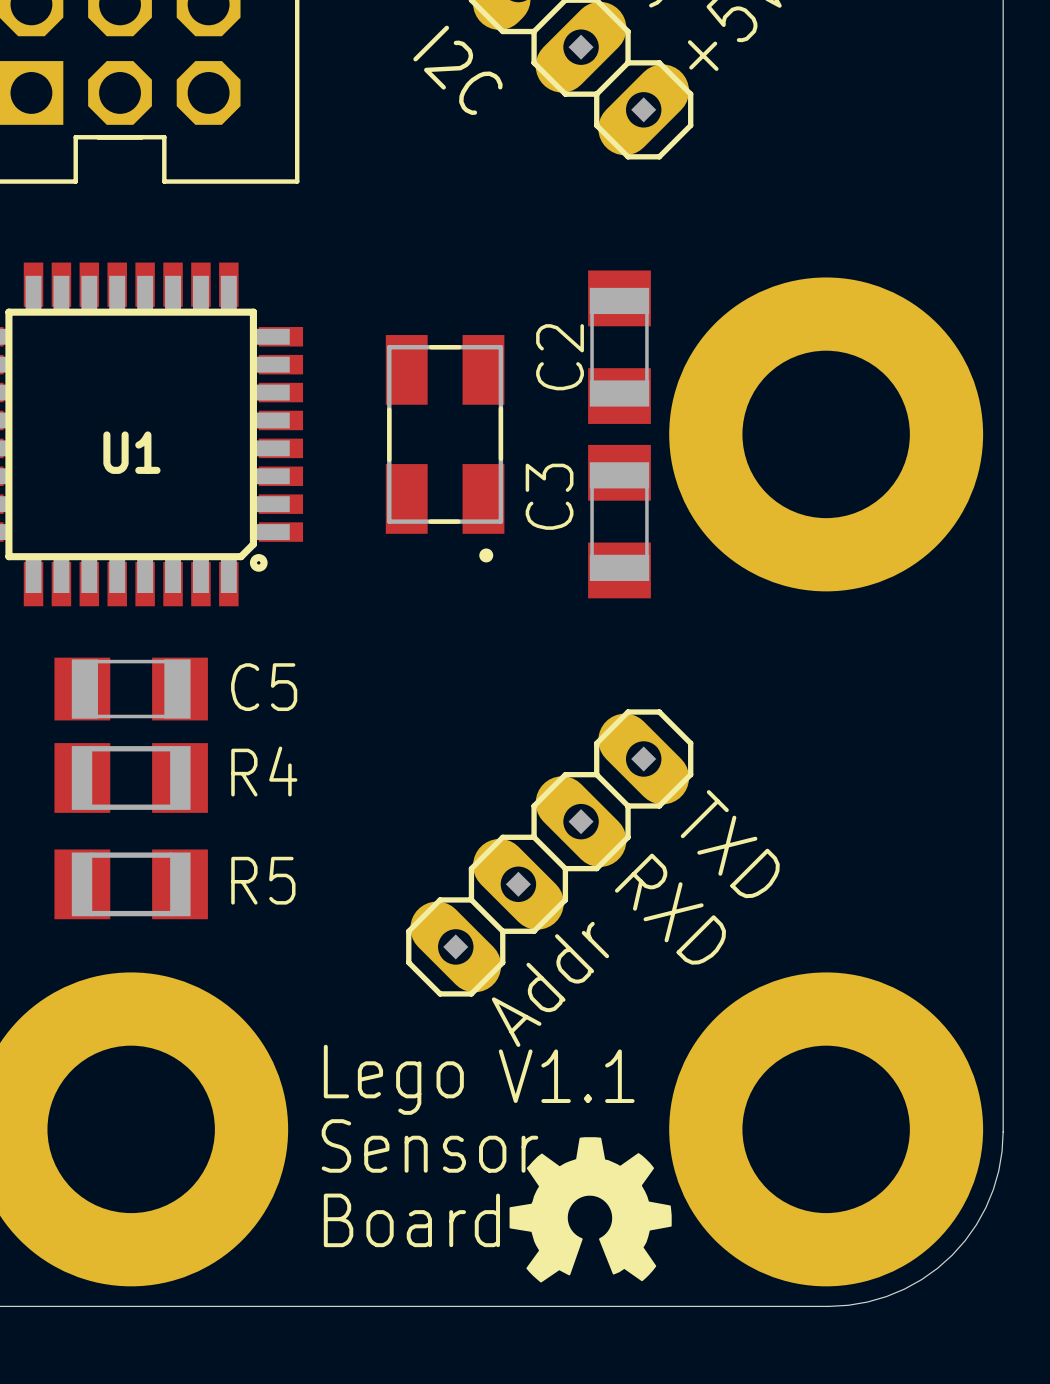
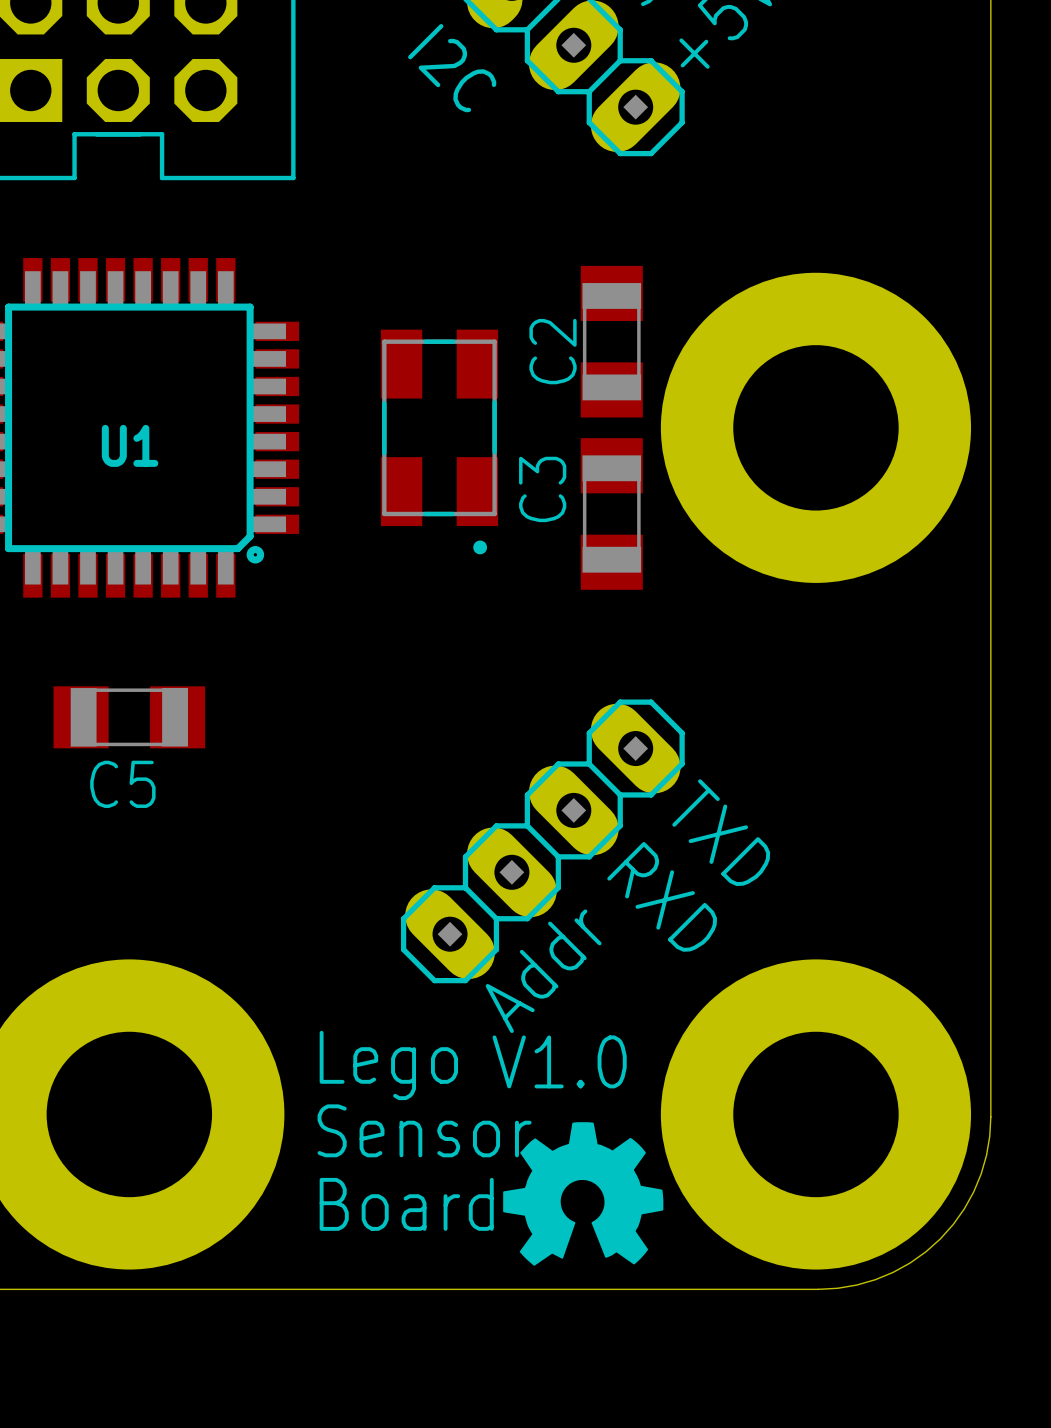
C5 name position: C5 (264, 687) -> C5 (122, 784)
C5 position: (131, 689) -> (129, 717)
R4: (131, 777) -> none
R5: (131, 884) -> none
text: V1.1 (566, 1076) -> V1.0 (559, 1061)

